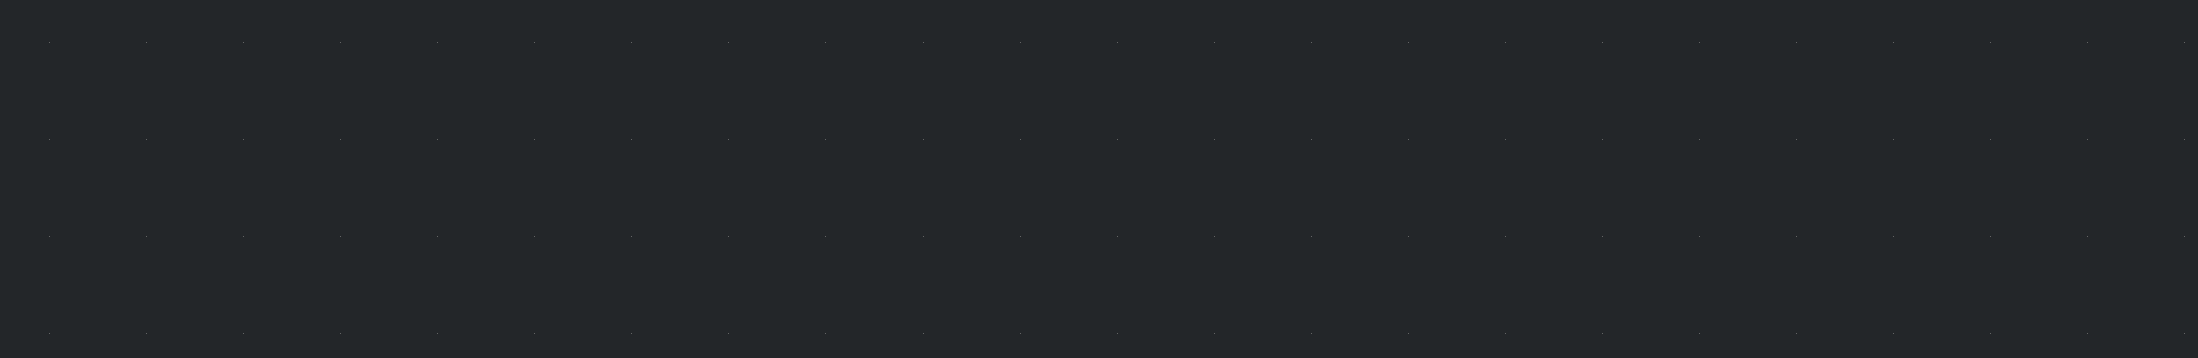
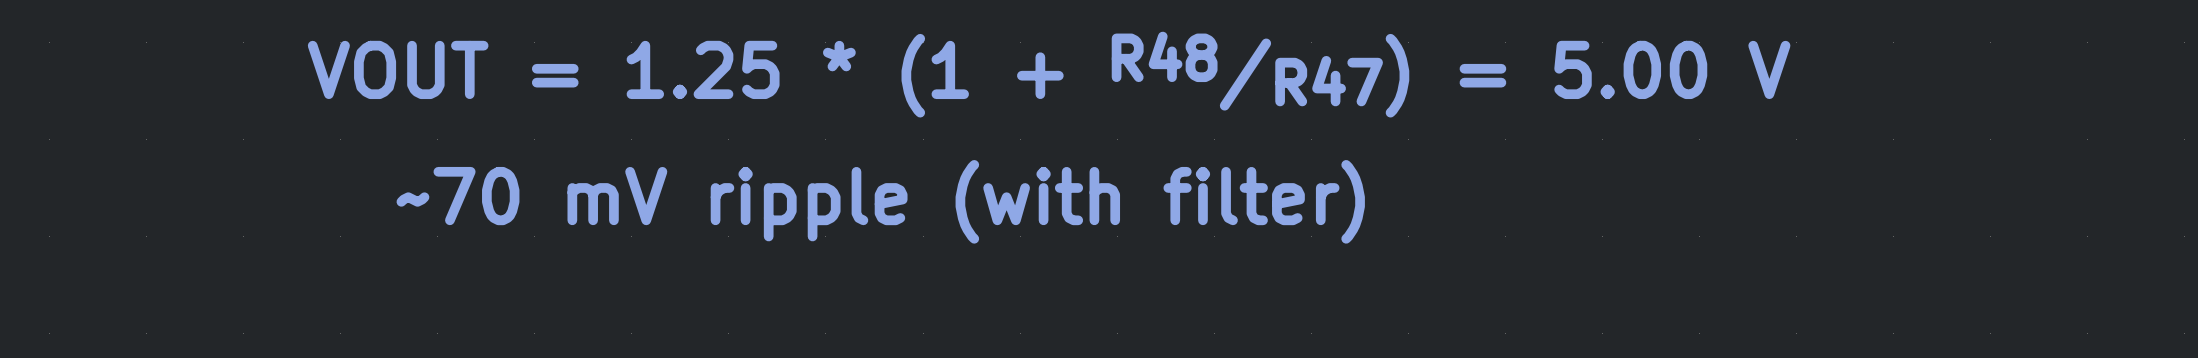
text: none -> VOUT = 1.25 * (1 + R48/R47) = 5.00 V (1049, 74)
text: none -> ~70 mV ripple (with filter) (880, 201)

